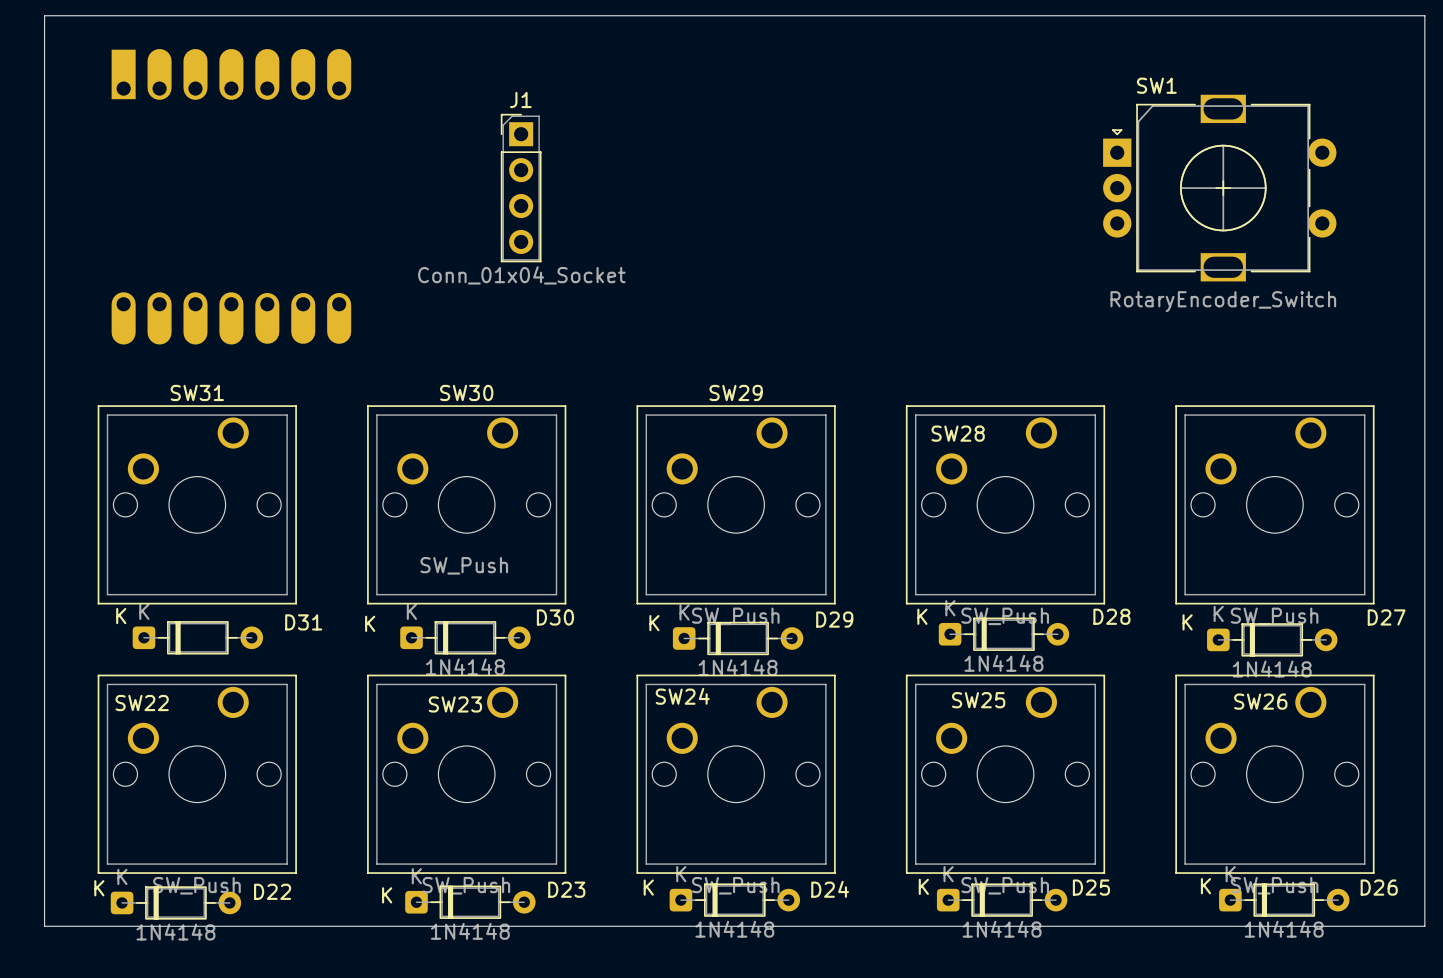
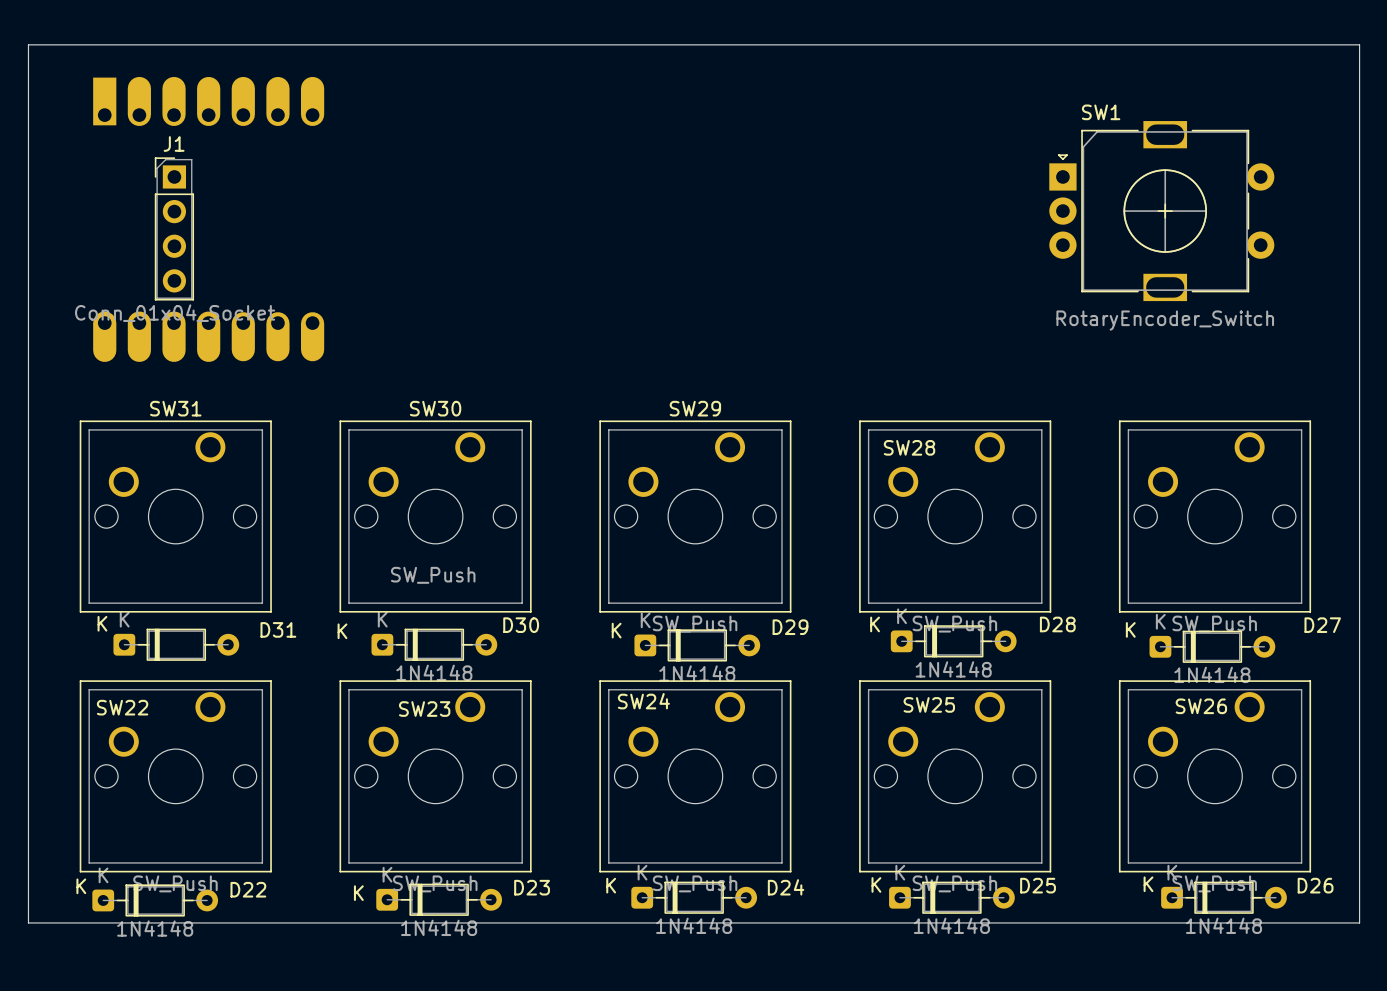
J1 position: (521, 188) -> (174, 228)

